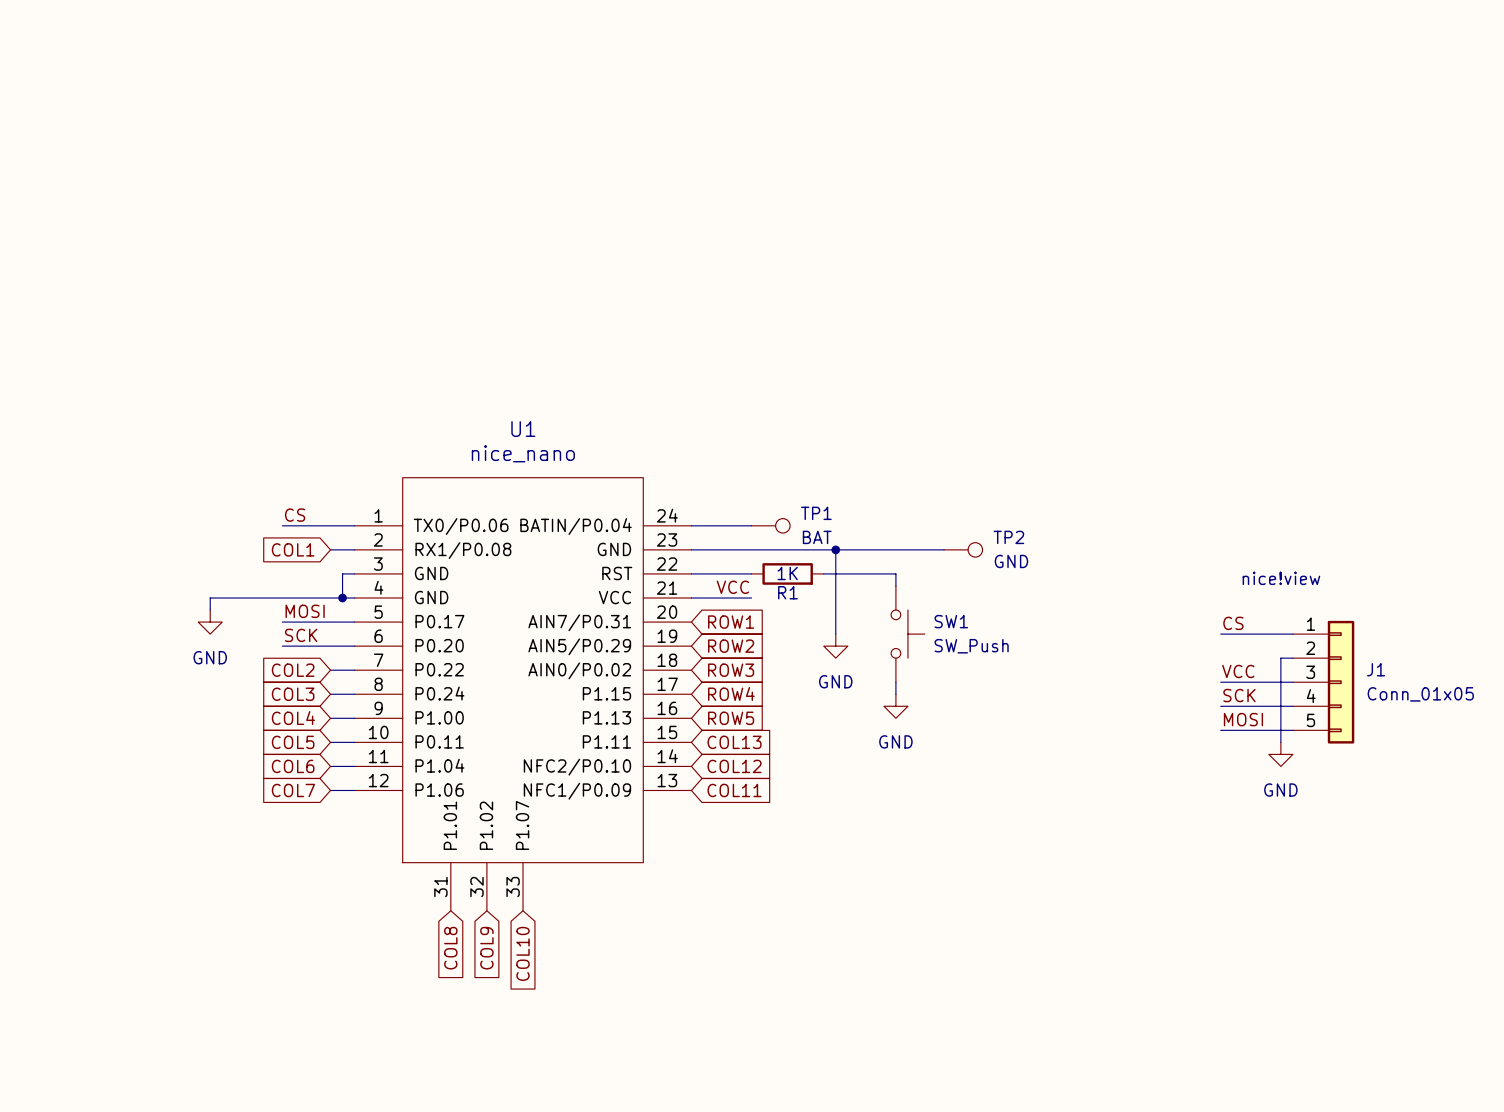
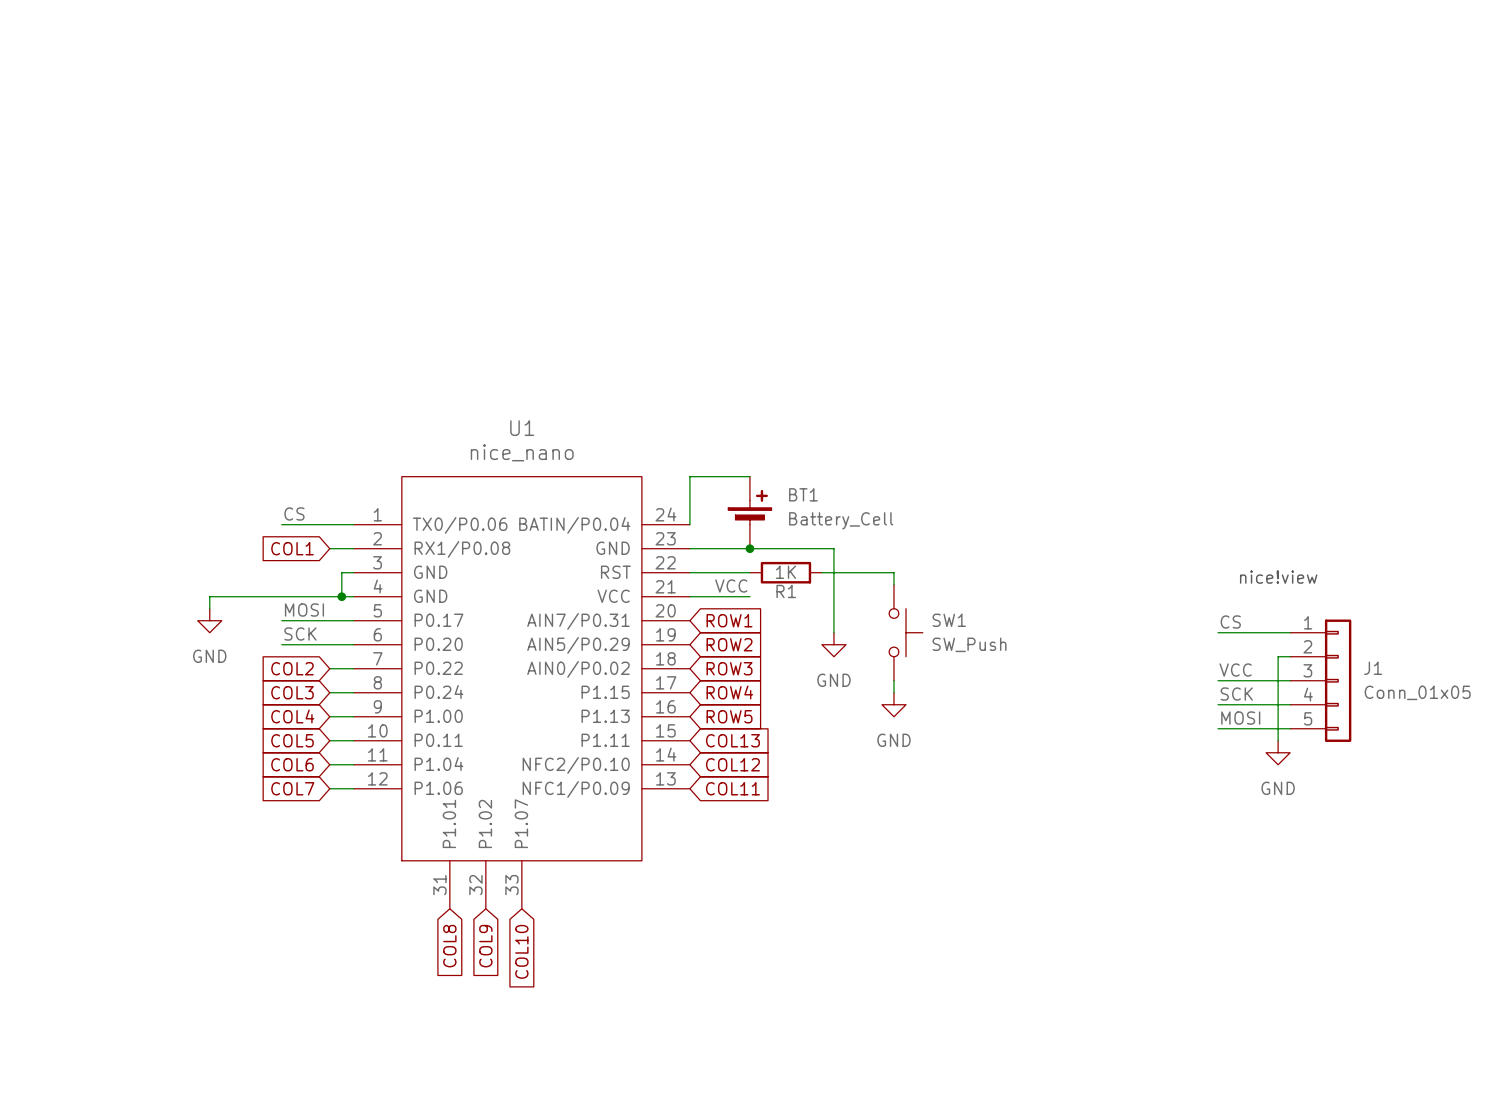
BT1: none -> Battery_Cell (749, 512)
wire: (691, 525) (751, 525) -> (689, 524) (689, 476) (749, 476)
TP1: BAT (770, 525) -> none
junction: none -> (749, 548)
wire: (835, 549) (944, 549) -> none
junction: (835, 549) -> none
TP2: GND (963, 549) -> none

